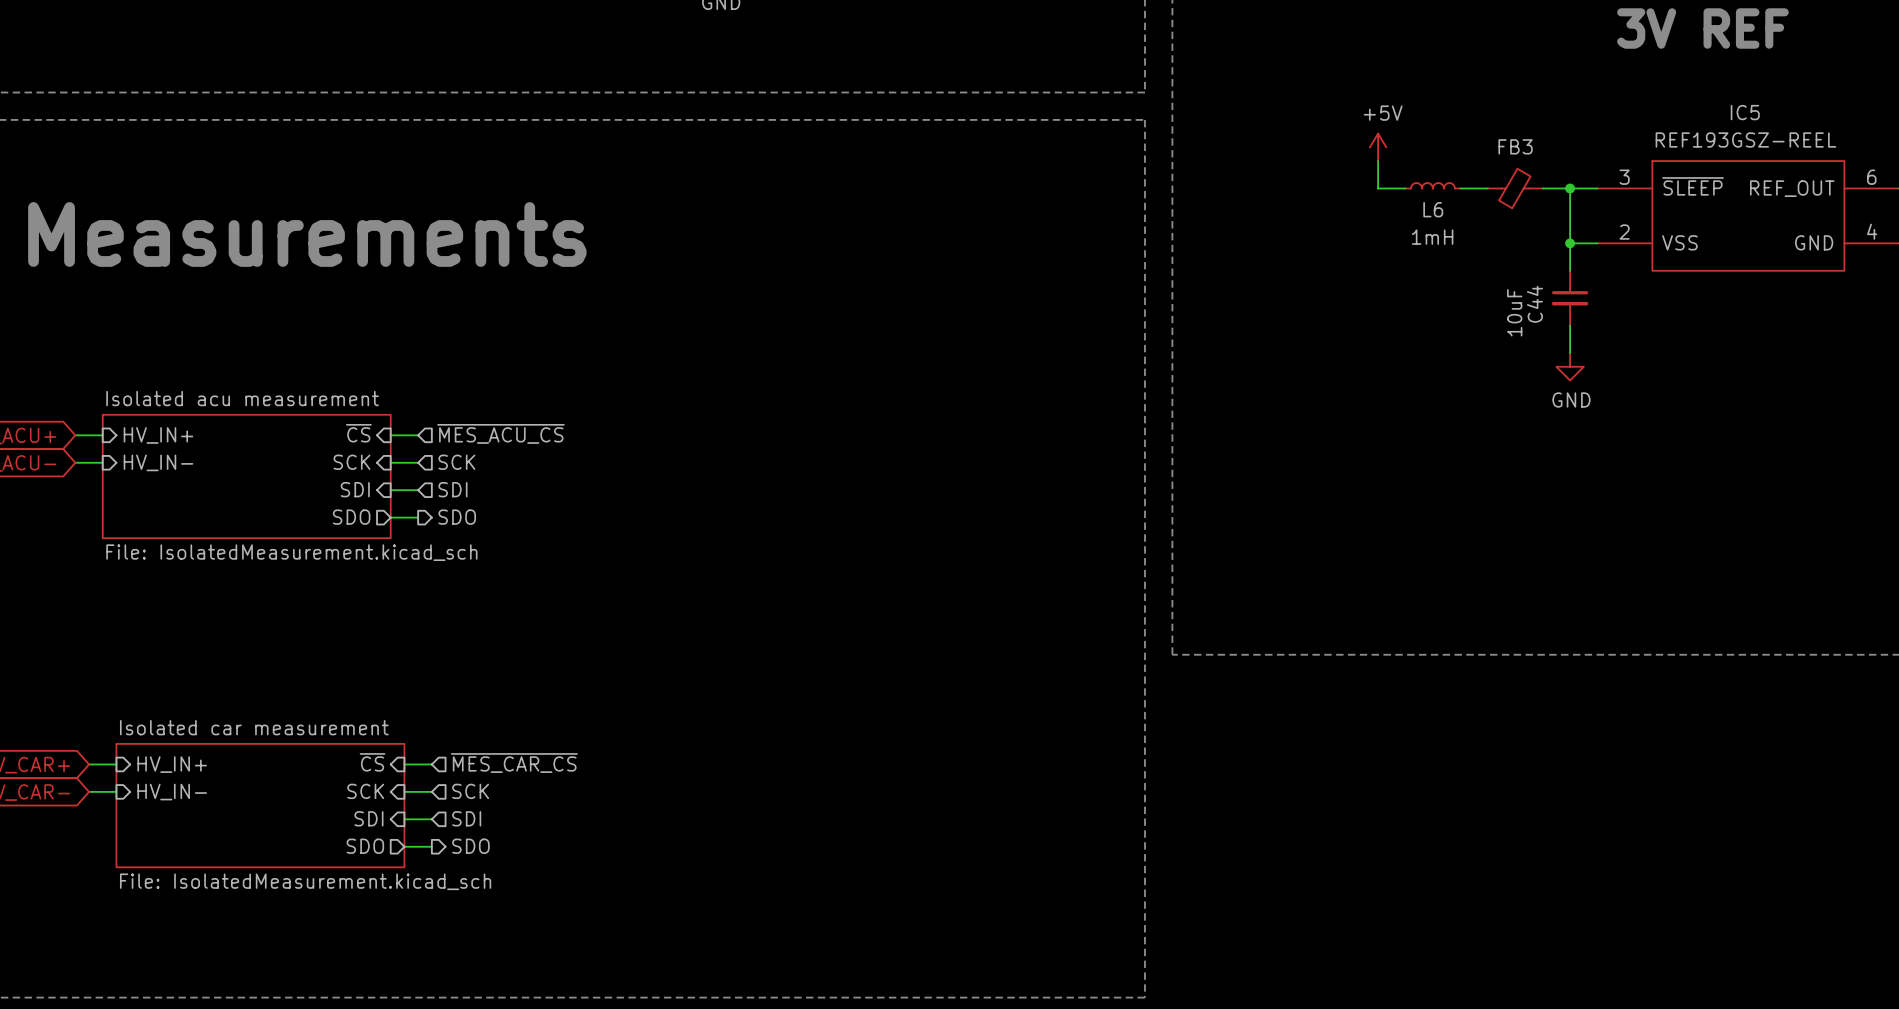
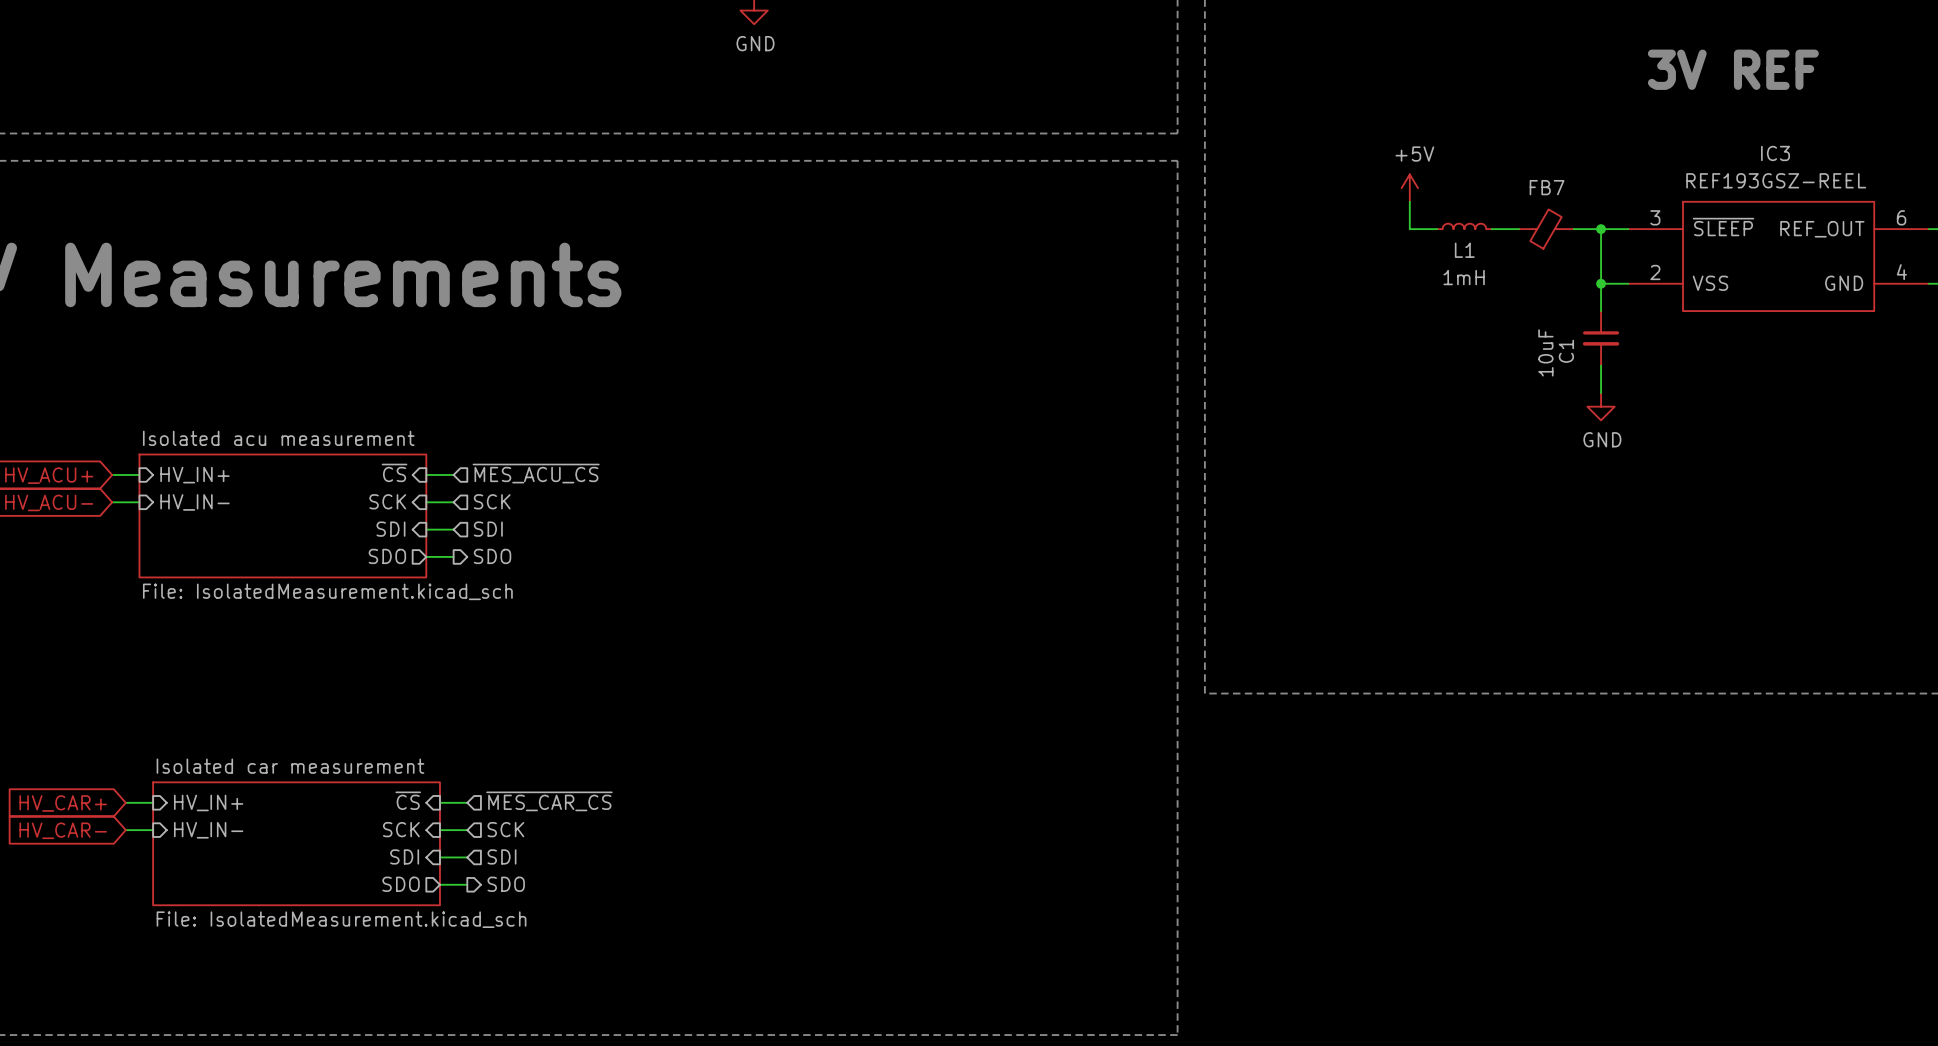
IC5 name: IC5 (1745, 112) -> IC3 (1775, 153)
FB3 name: FB3 (1515, 146) -> FB7 (1547, 187)
L6 name: L6 (1433, 209) -> L1 (1464, 250)
C44 name: C44 (1534, 304) -> C1 (1566, 351)

